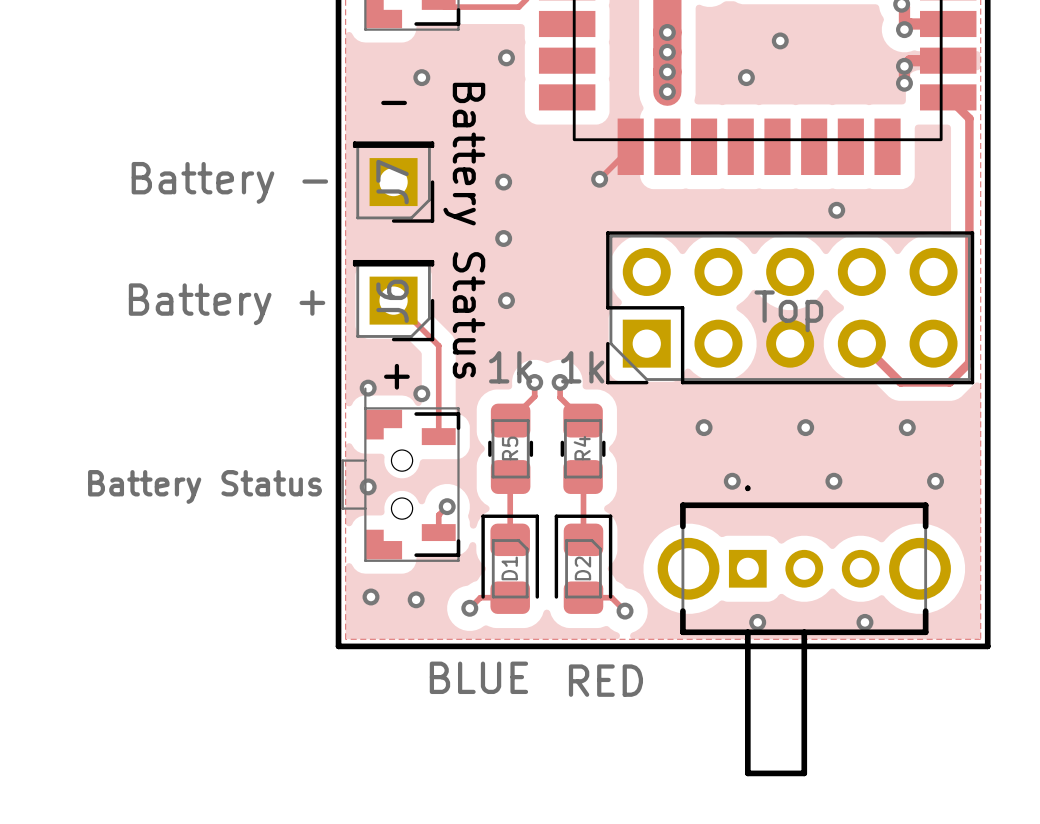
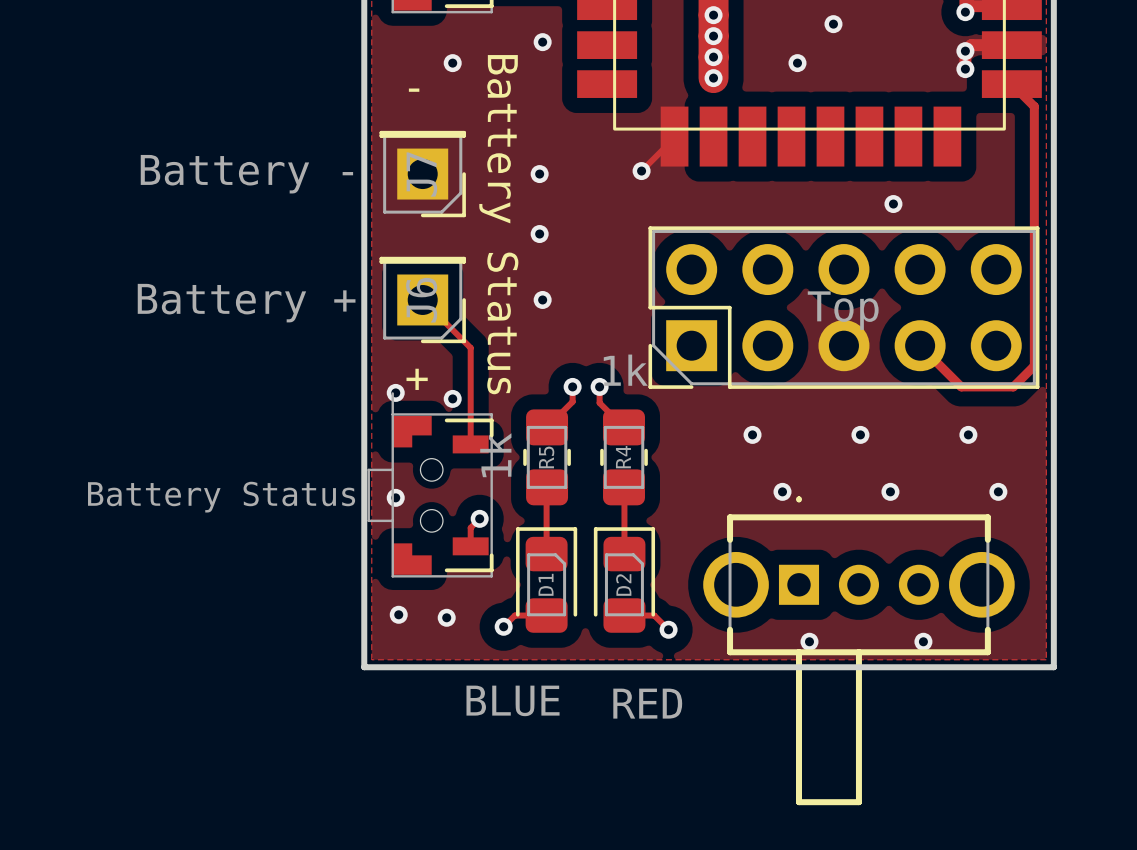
R5 value rotation: 0° (510, 367) -> 90° counterclockwise (495, 455)
R5 value position: 1k (510, 367) -> 1k (495, 455)

